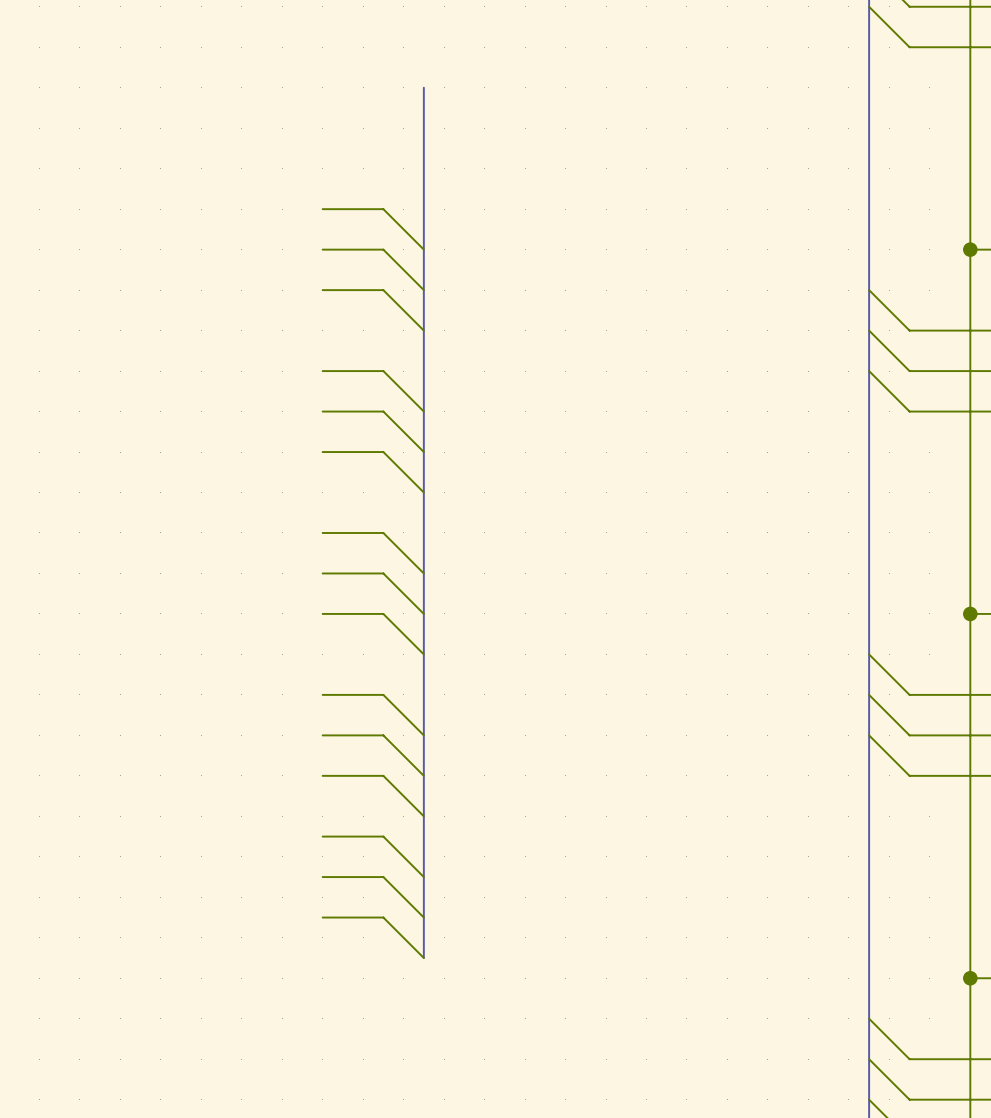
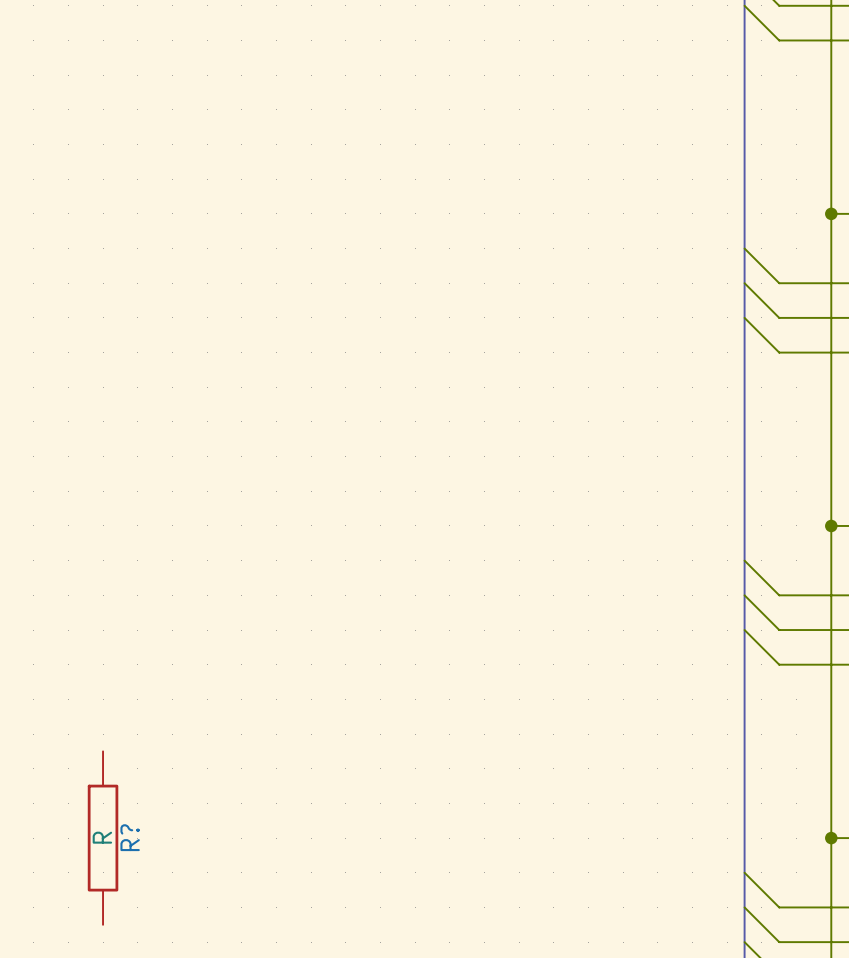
bus: (423, 87) (423, 958) -> none
wire: (322, 209) (383, 209) (423, 249) -> none
wire: (322, 249) (383, 249) (423, 290) -> none
wire: (322, 290) (383, 290) (423, 330) -> none
wire: (322, 371) (383, 371) (423, 411) -> none
wire: (322, 411) (383, 411) (423, 452) -> none
wire: (322, 452) (383, 452) (423, 492) -> none
wire: (322, 532) (383, 532) (423, 573) -> none
wire: (322, 573) (383, 573) (423, 613) -> none
wire: (322, 613) (383, 613) (423, 654) -> none
wire: (322, 694) (383, 694) (423, 735) -> none
wire: (322, 735) (383, 735) (423, 775) -> none
wire: (322, 775) (383, 775) (423, 816) -> none
wire: (322, 836) (383, 836) (423, 877) -> none
wire: (322, 877) (383, 877) (423, 917) -> none
wire: (322, 917) (383, 917) (423, 958) -> none
R?: none -> R (103, 838)

